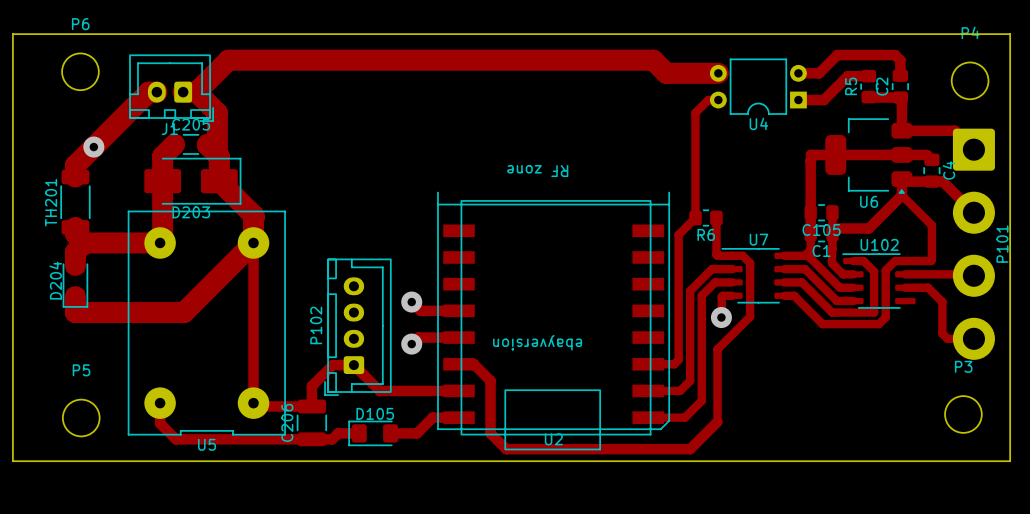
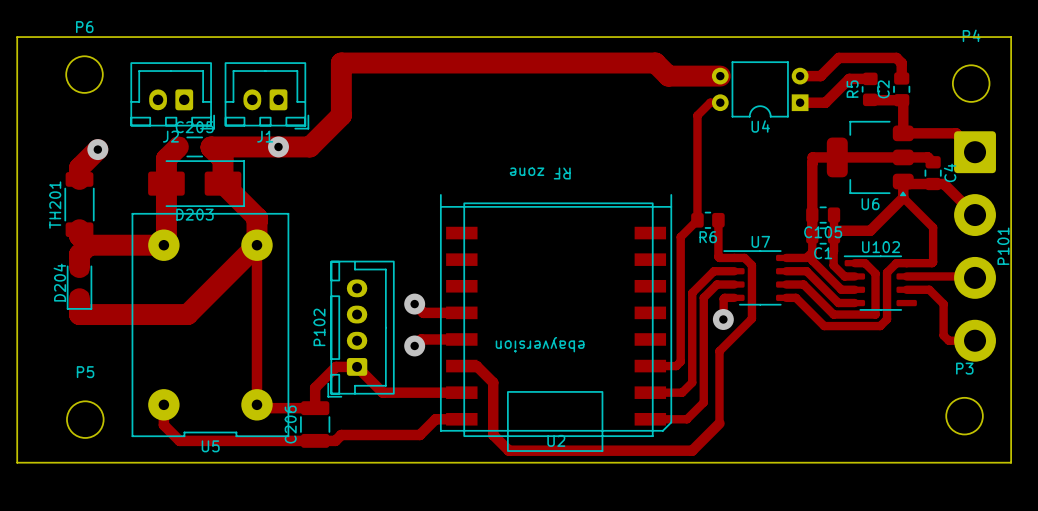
track: (338, 60) (228, 60) (196, 92) -> (341, 63) (341, 115) (309, 146) (211, 146)
J1 position: (171, 88) -> (266, 95)
track: (156, 92) (148, 92) (93, 147) -> none
track: (196, 92) (217, 112) (217, 154) -> none
J2: none -> (172, 95)
via: none -> (278, 146)
track: none -> (362, 434) (393, 434)
D105: (373, 433) -> none

